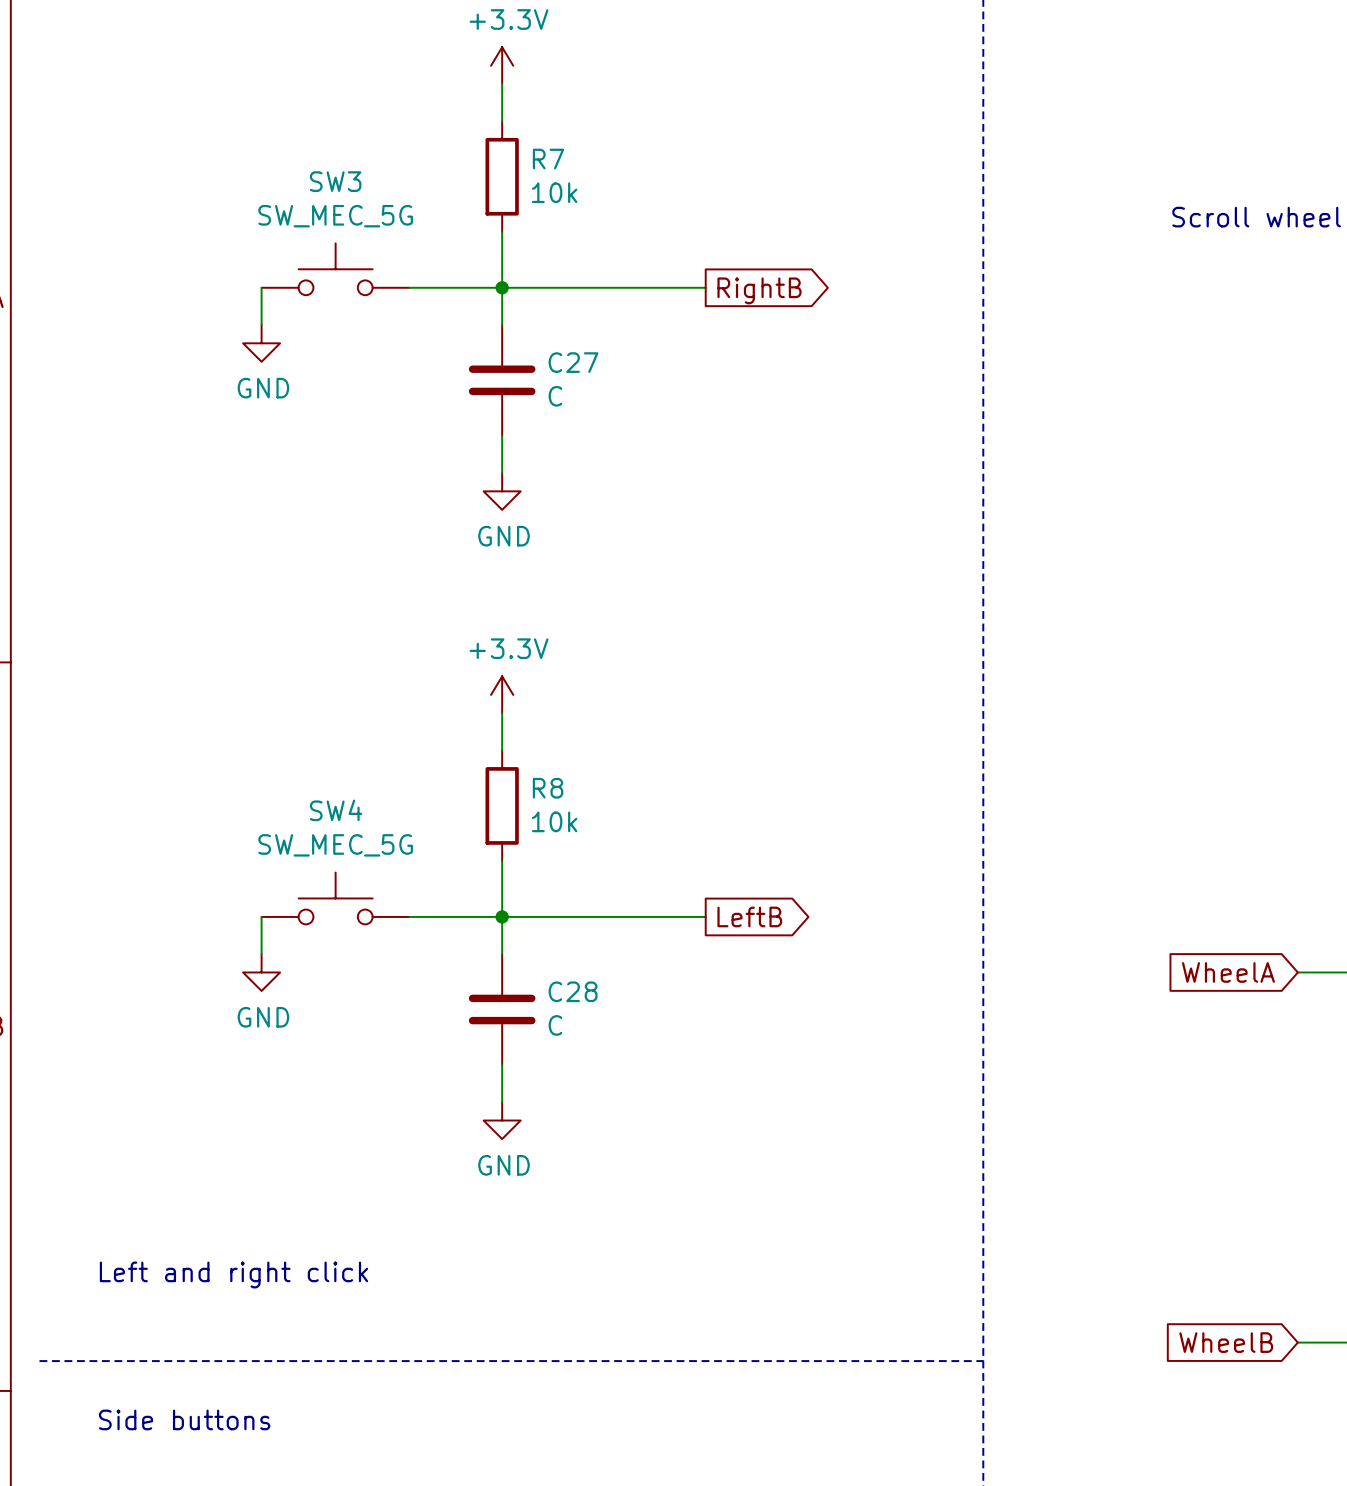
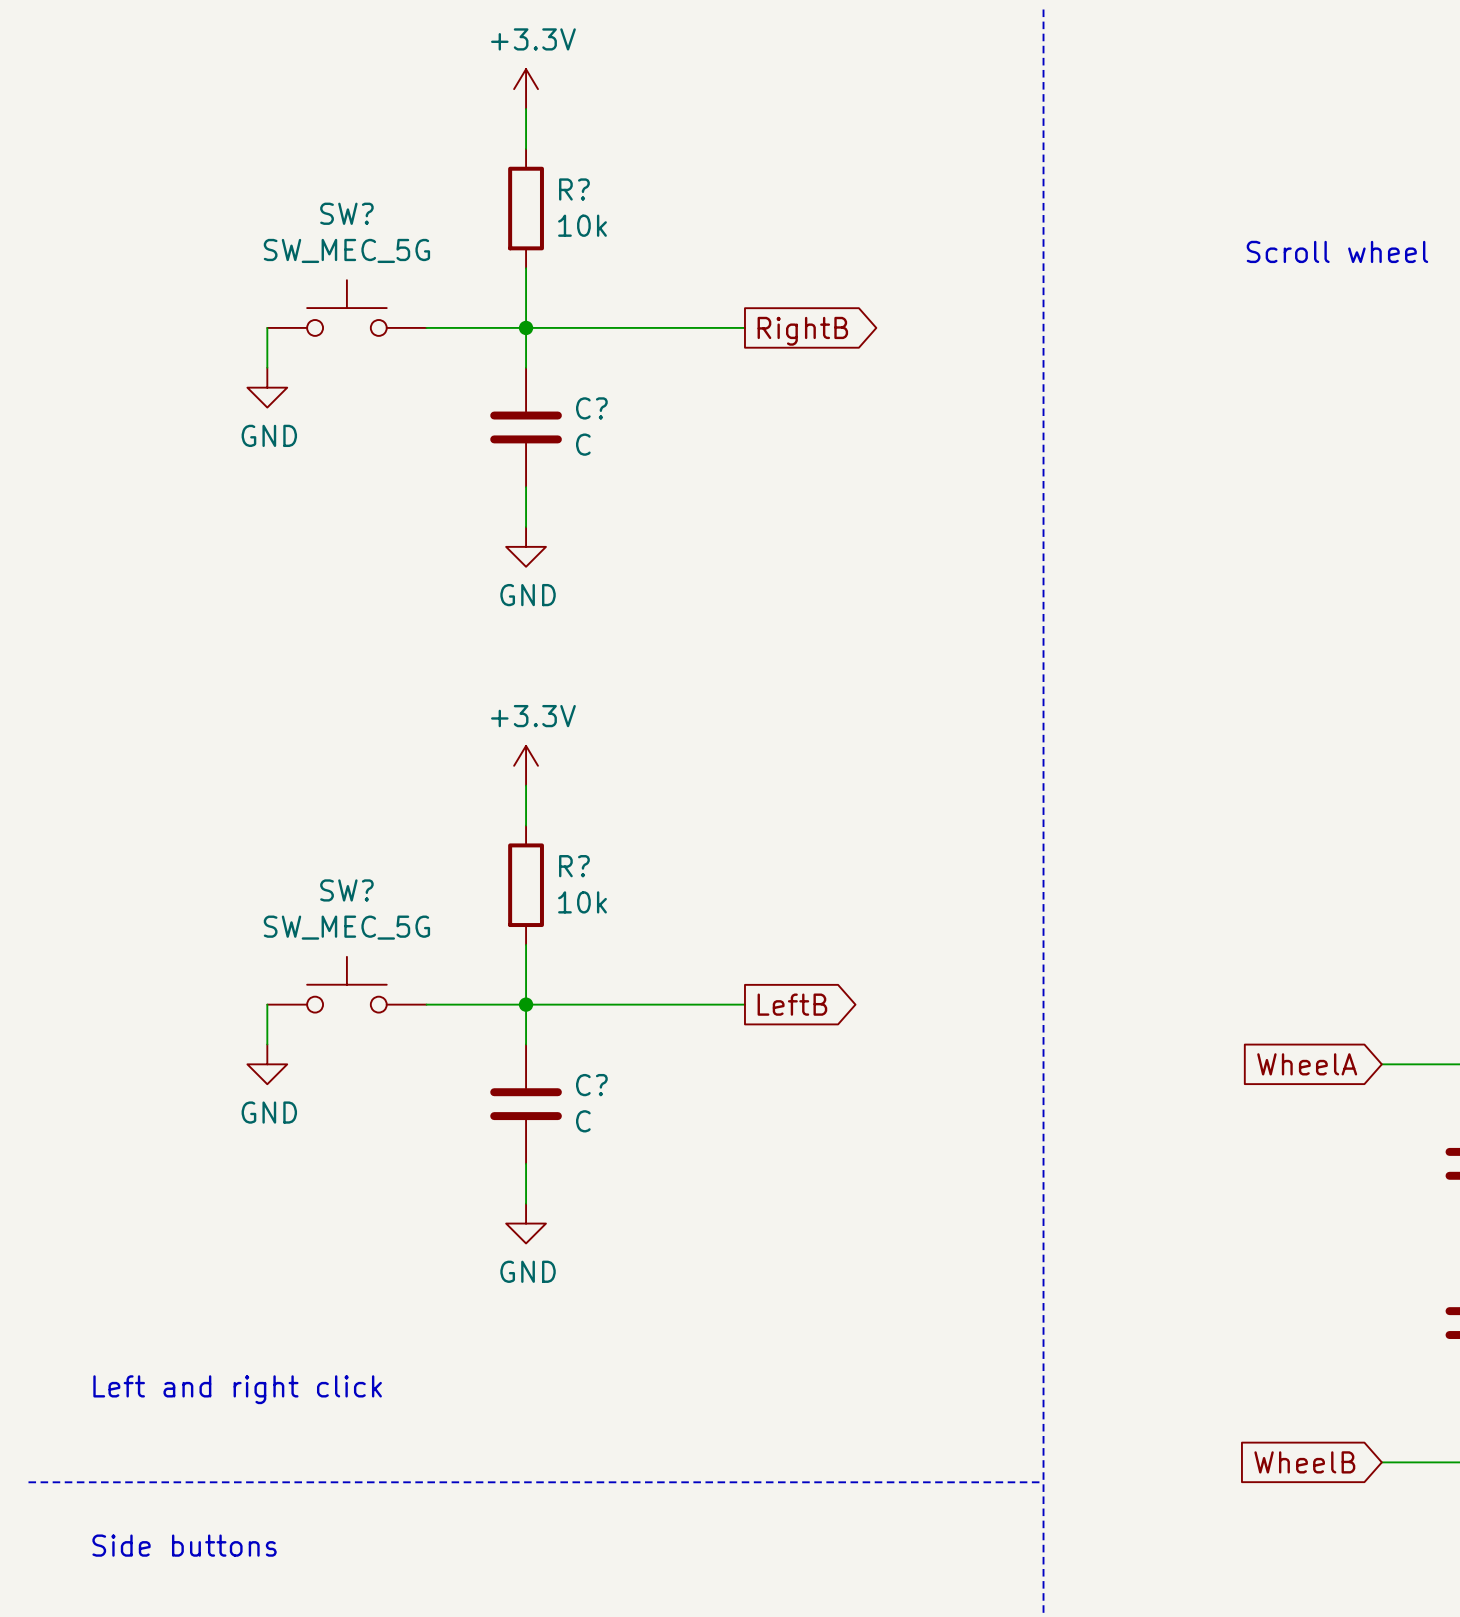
R7 name: R7 (548, 159) -> R? (574, 189)
SW3 name: SW3 (335, 181) -> SW? (346, 213)
C27 name: C27 (573, 362) -> C? (591, 408)
R8 name: R8 (548, 788) -> R? (574, 866)
SW4 name: SW4 (336, 810) -> SW? (346, 890)
C28 name: C28 (573, 991) -> C? (591, 1085)

